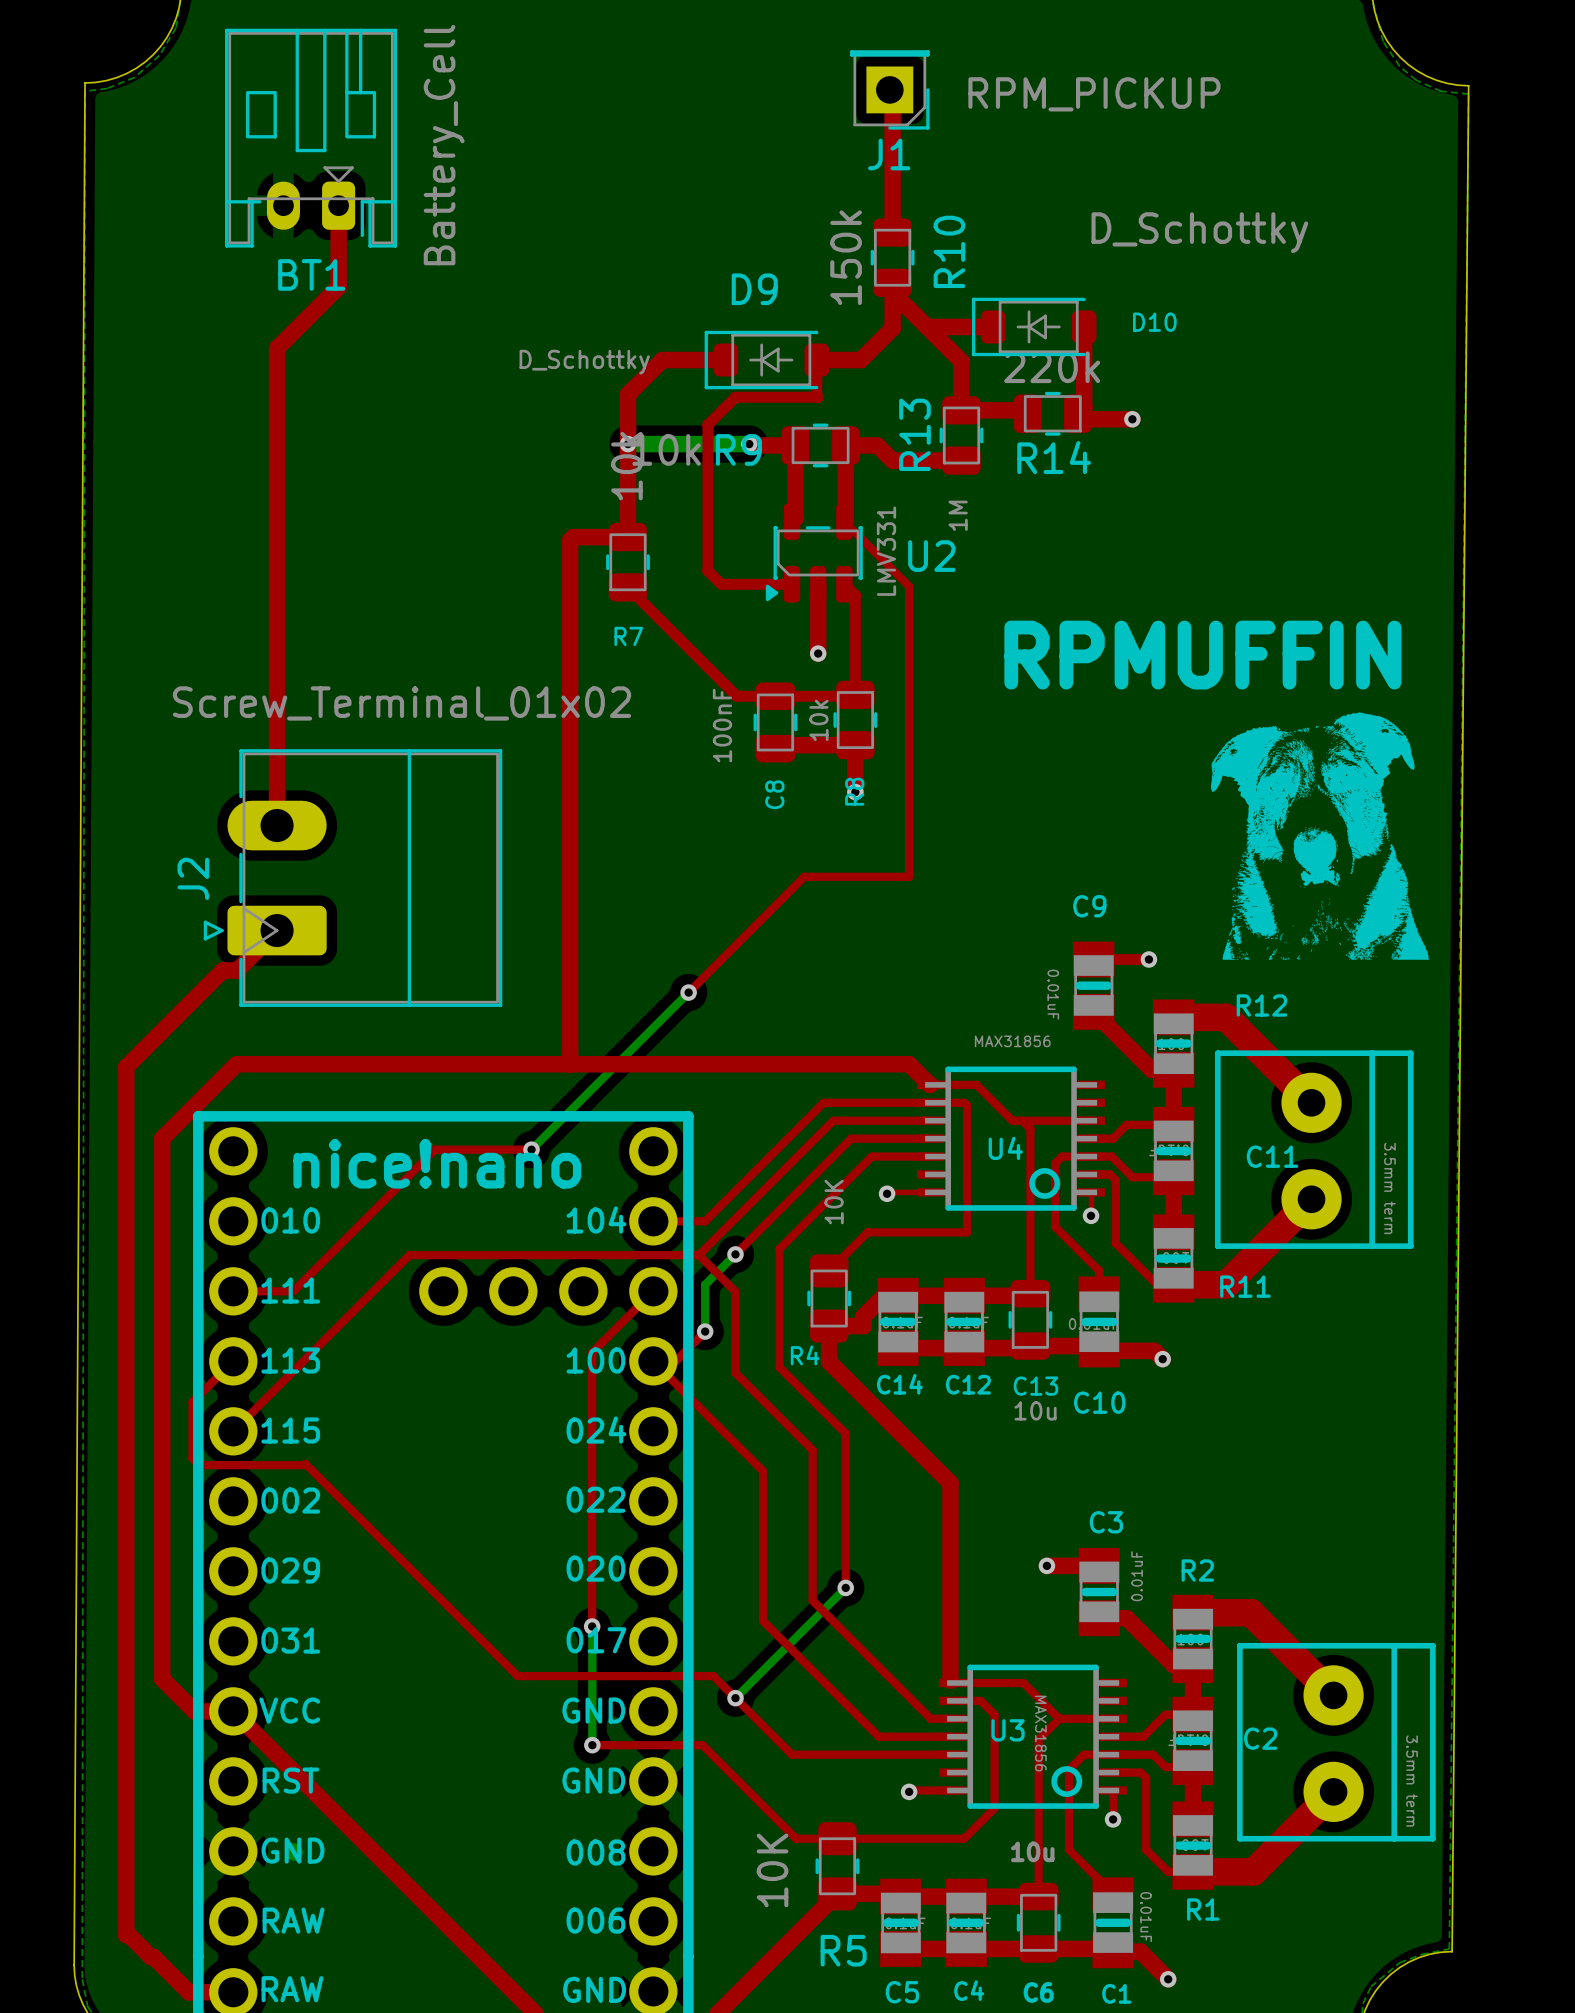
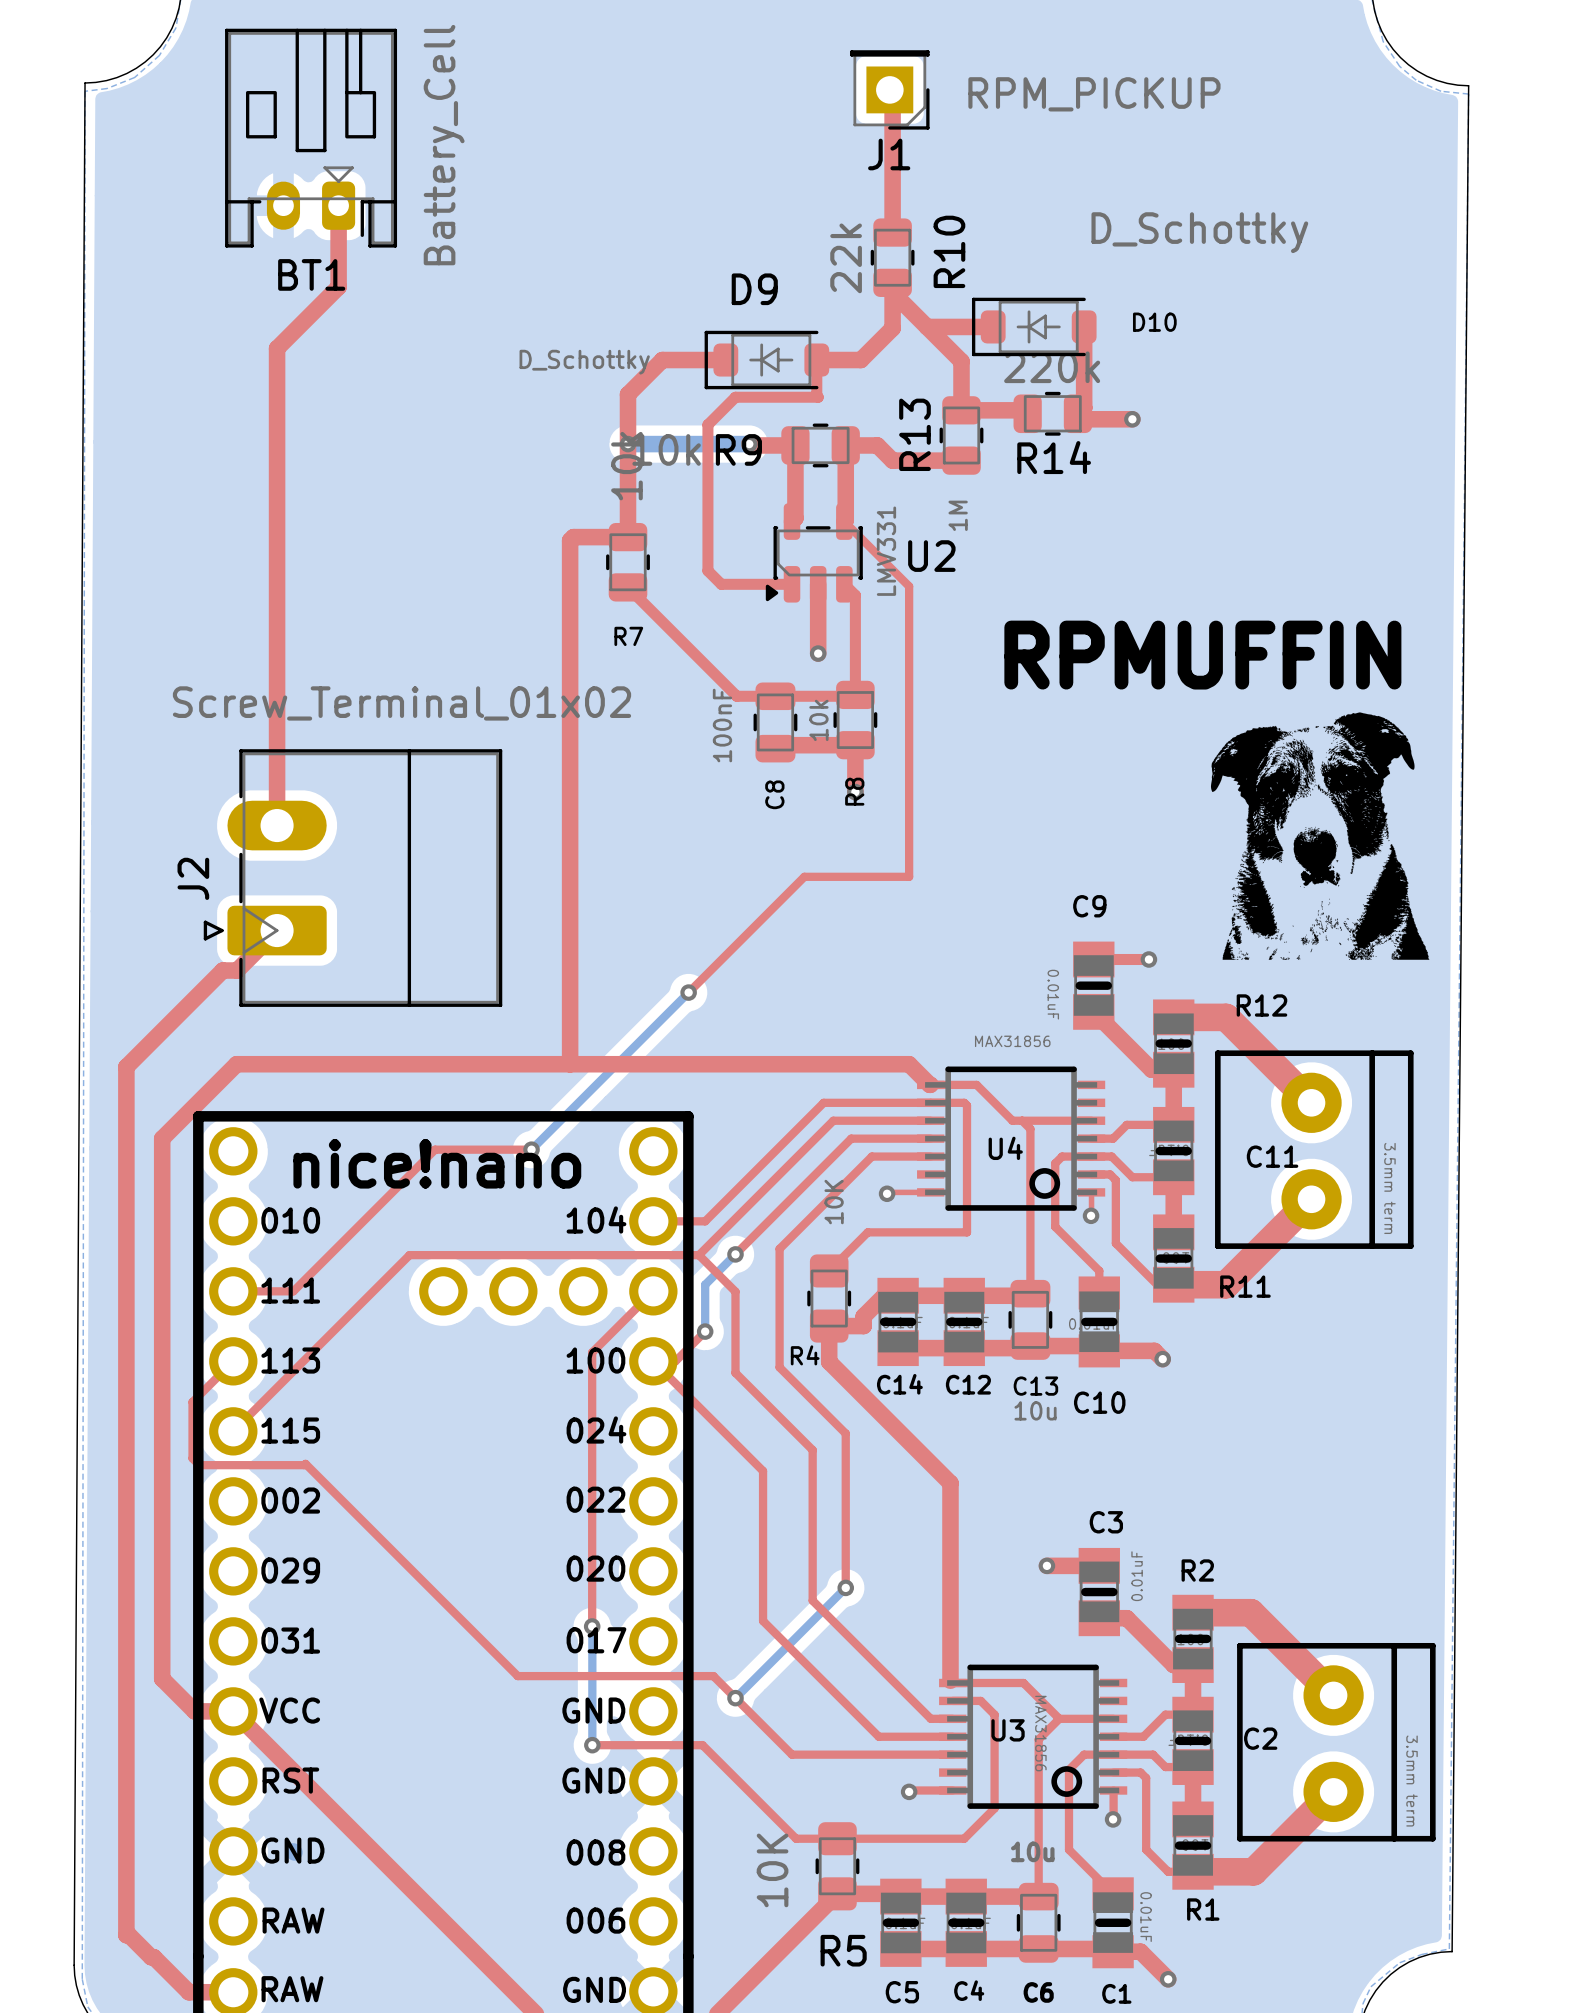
R10 value: 150k (846, 257) -> 22k (846, 258)

